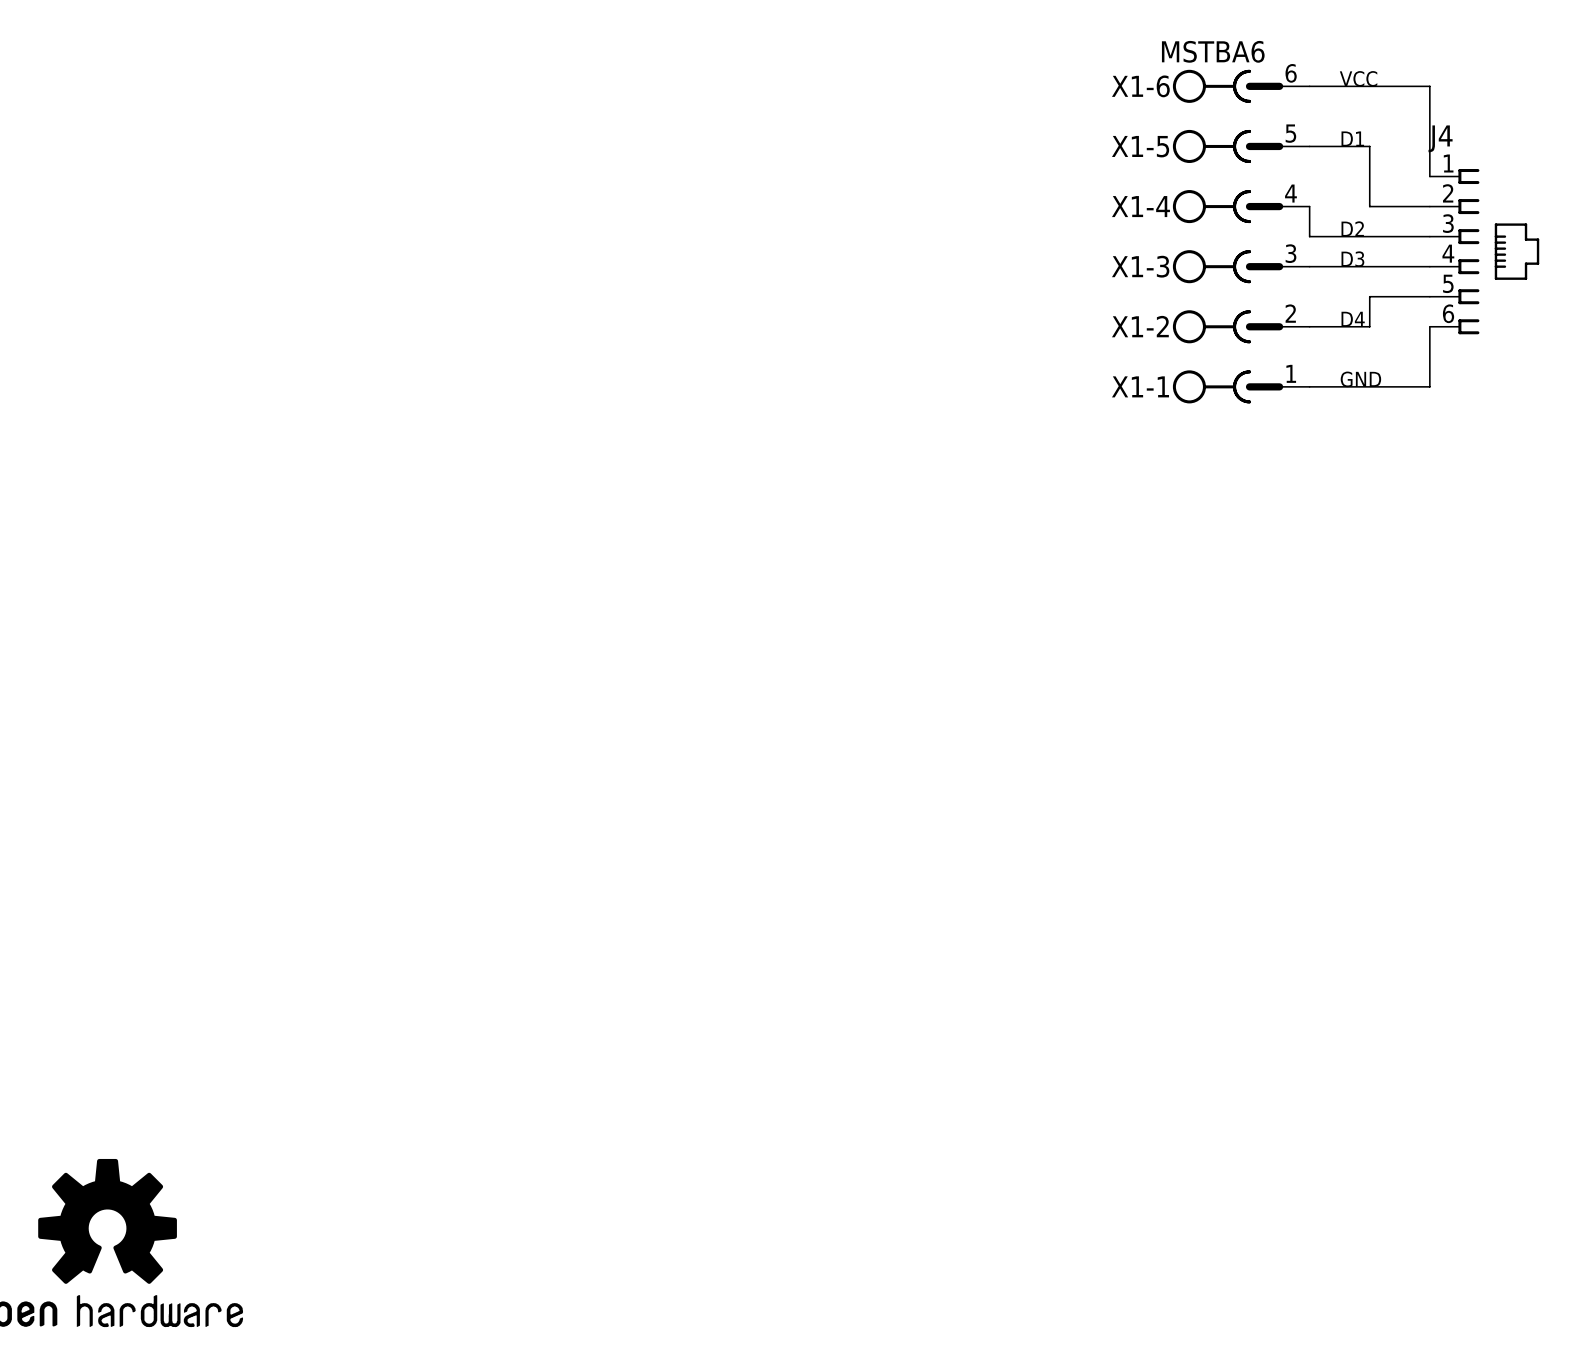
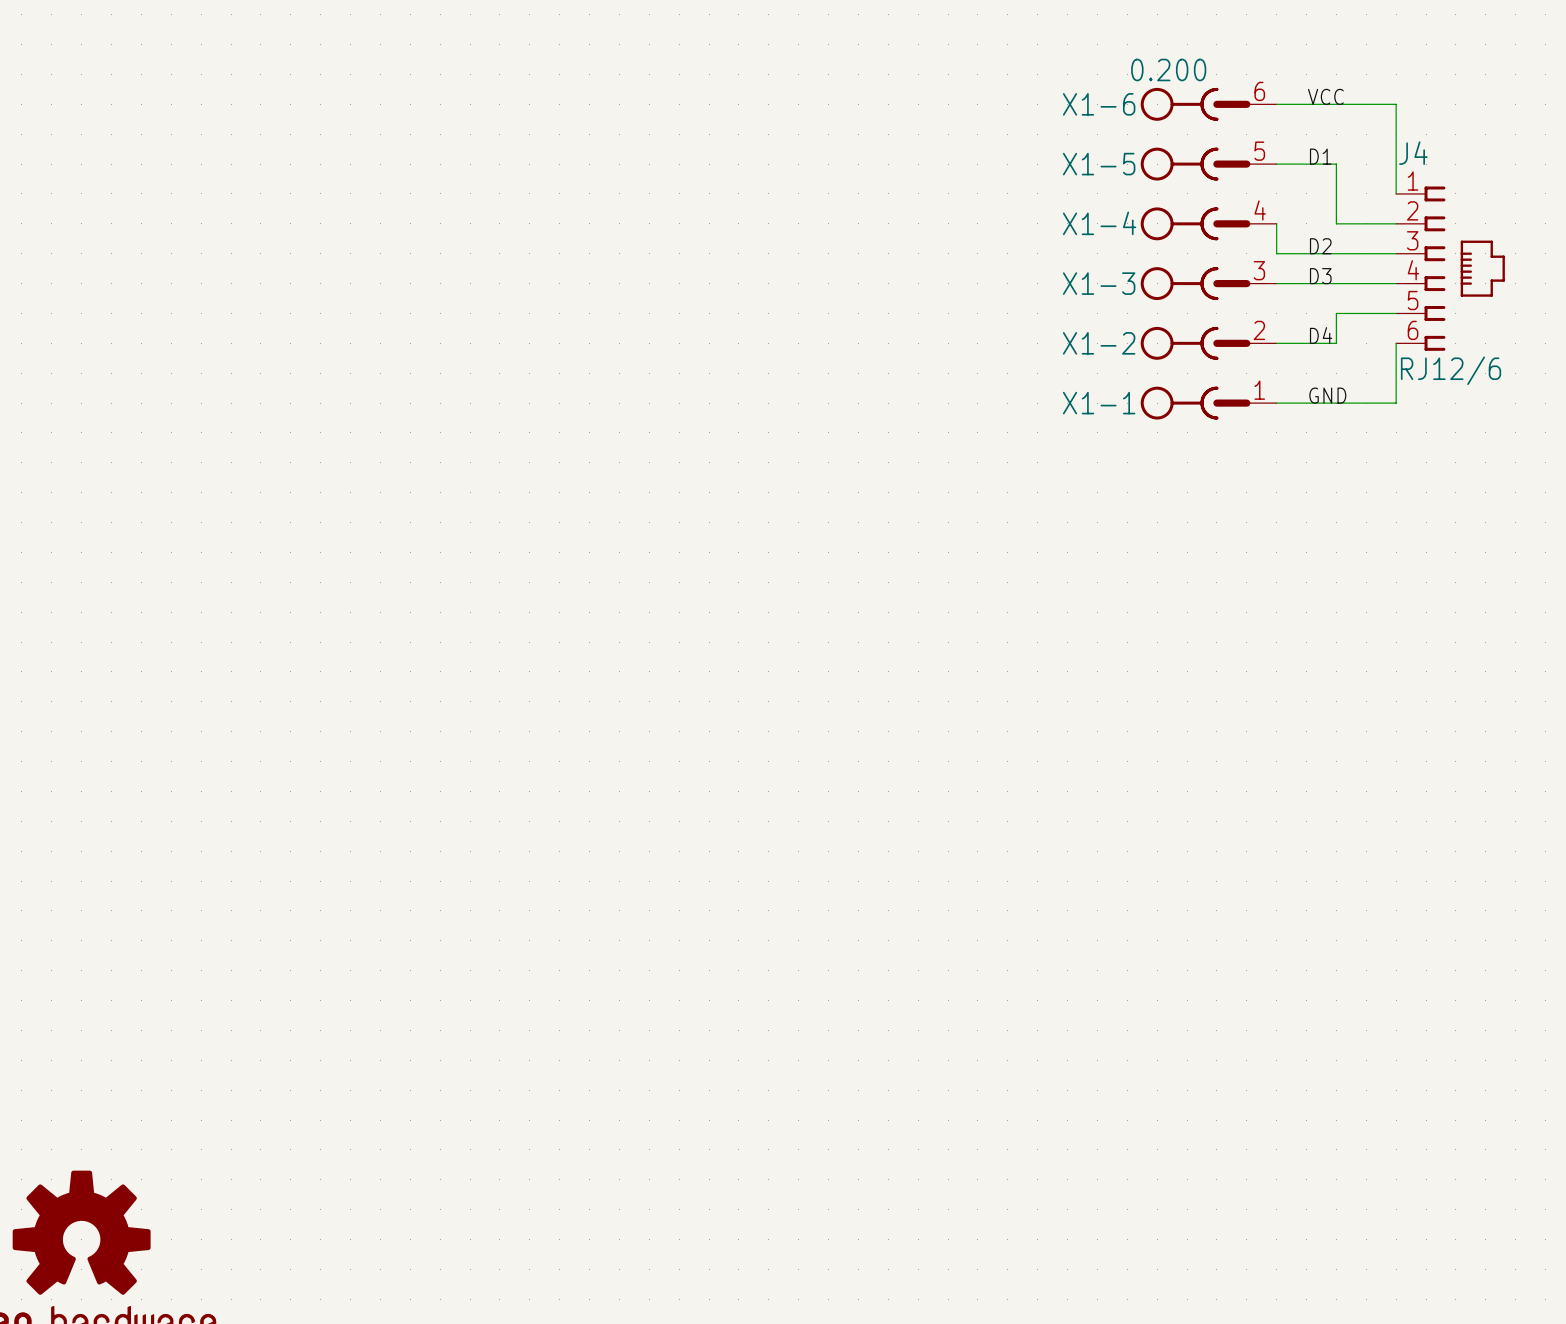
X1-6 value: MSTBA6 (1213, 51) -> 0.200 (1168, 69)
J4 value: none -> RJ12/6 (1451, 370)

